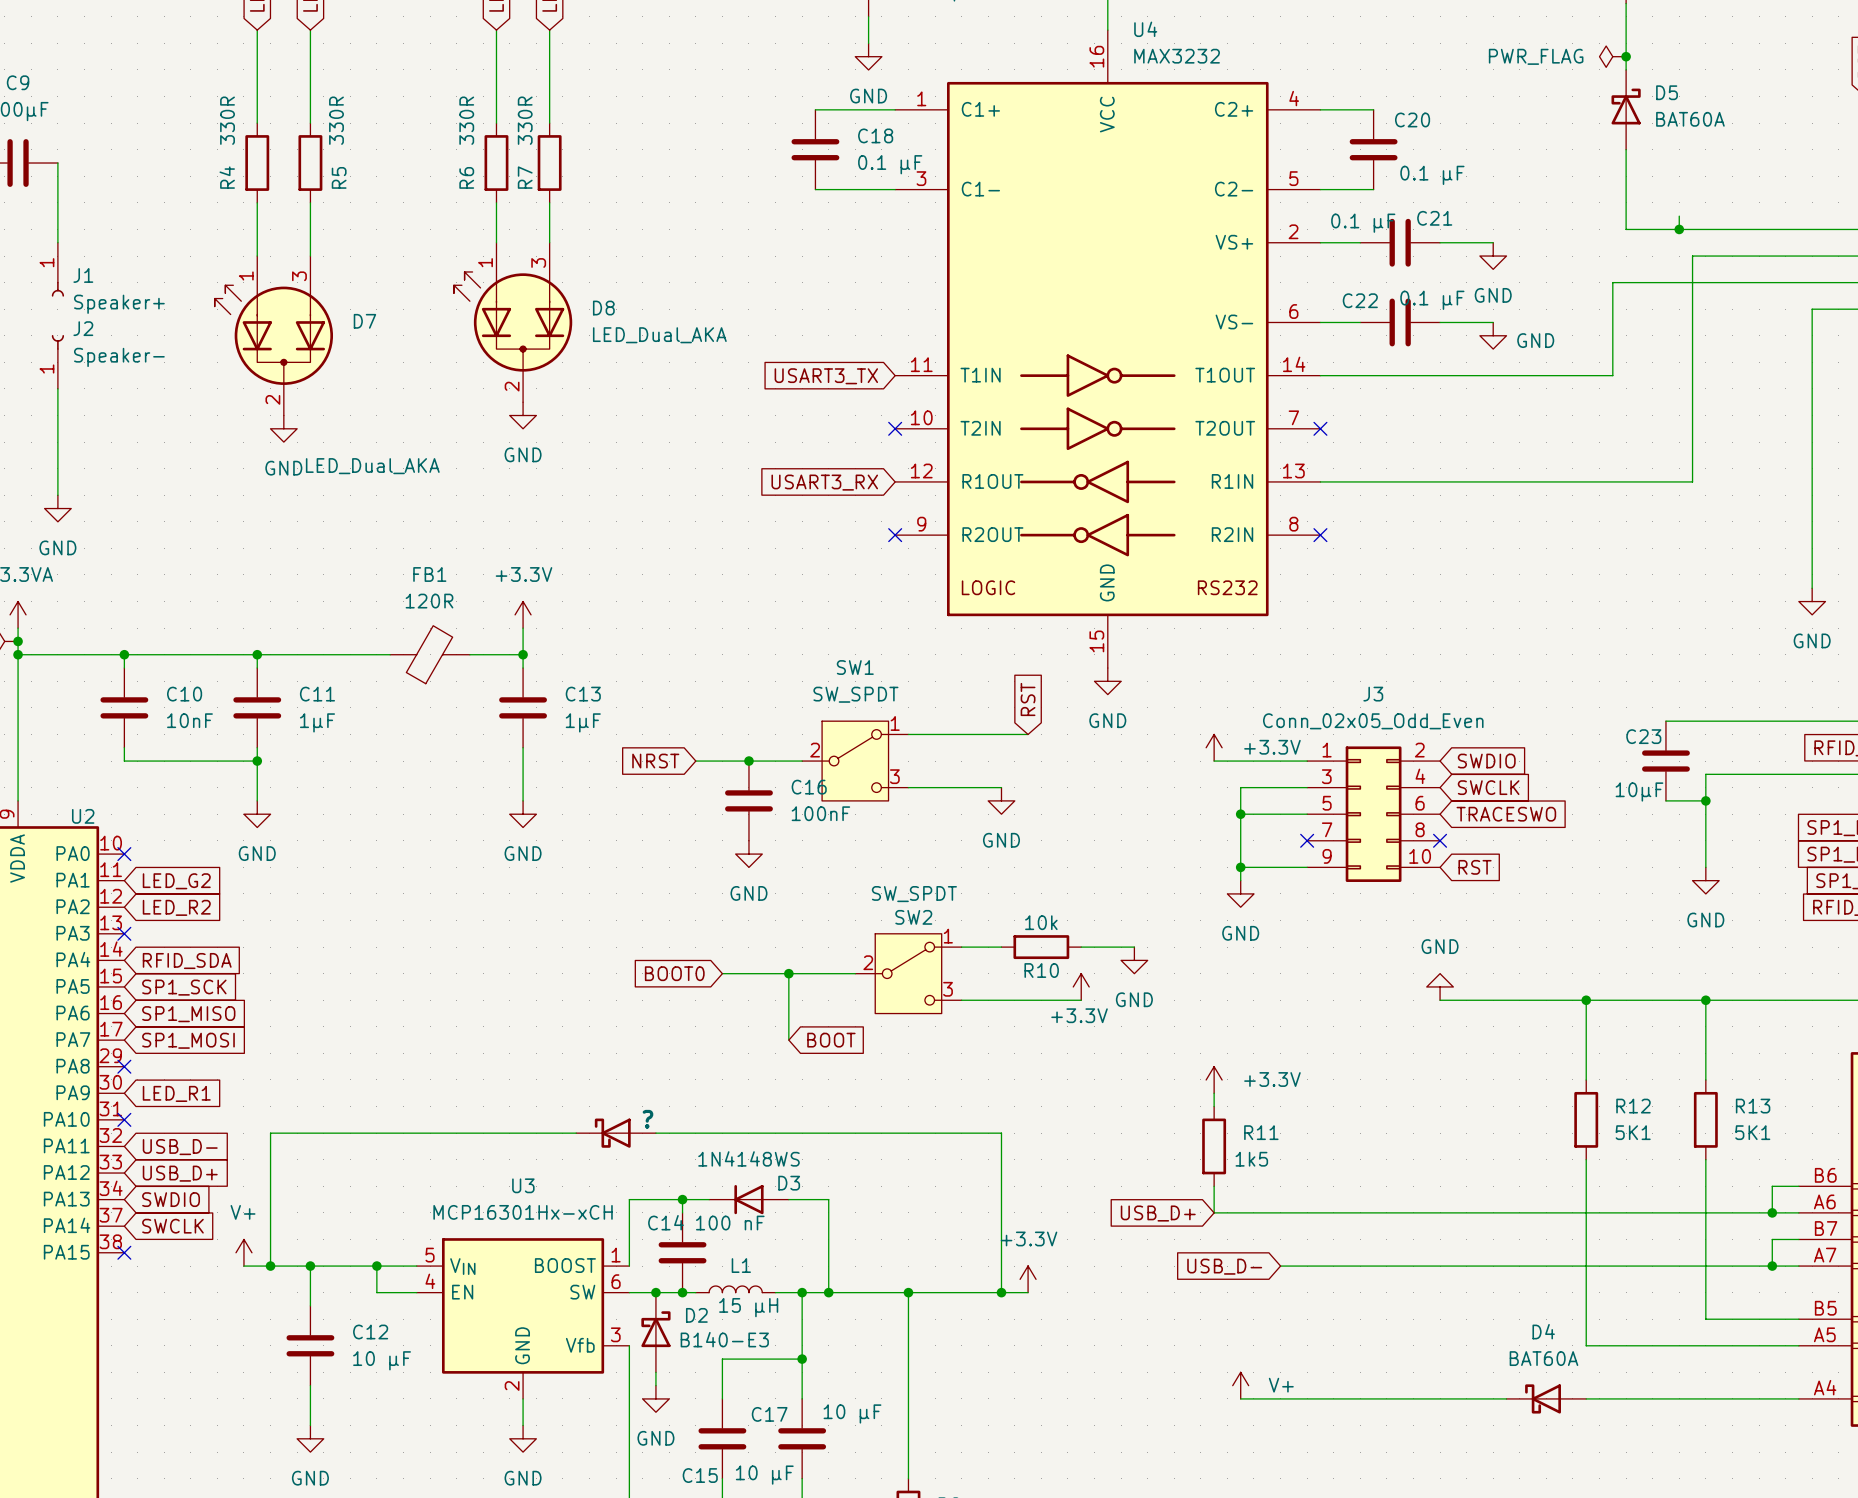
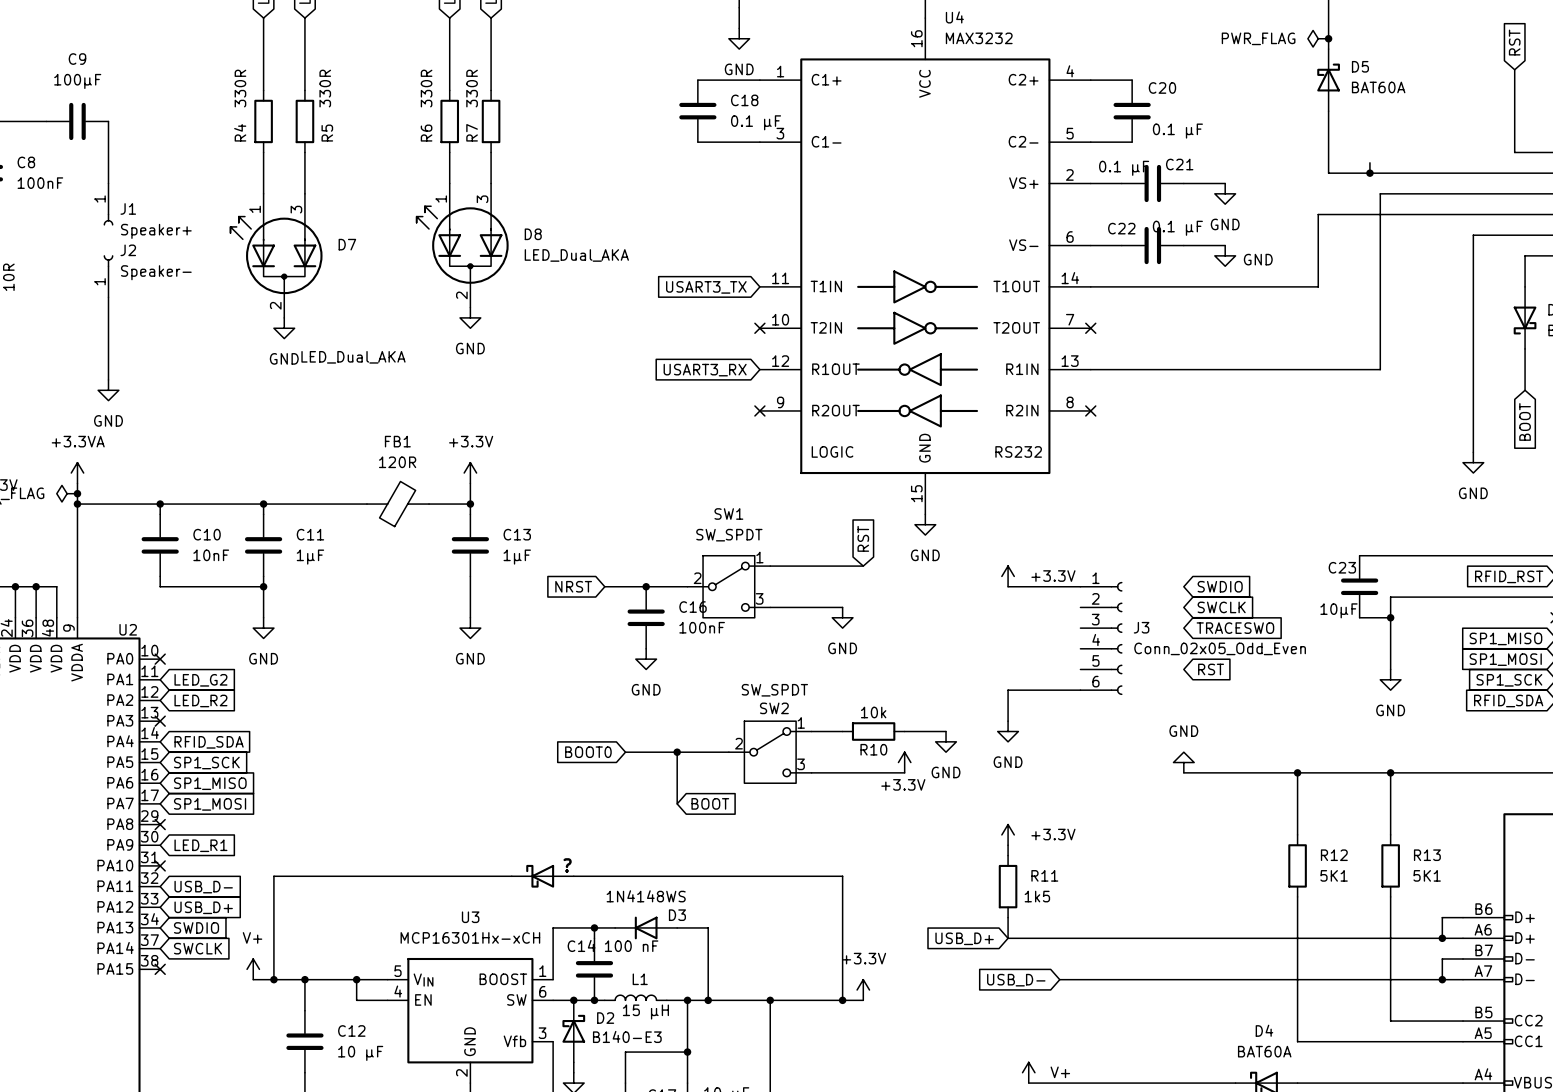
J3 name position: J3 (1373, 694) -> J3 (1141, 627)
J3 value position: Conn_02x05_Odd_Even (1373, 721) -> Conn_02x05_Odd_Even (1220, 648)
J3 symbol: [1307, 746, 1441, 882] -> [1080, 582, 1123, 695]
wire: (1307, 787) (1240, 787) (1240, 880) -> none
wire: (1240, 814) (1307, 814) -> none
junction: (1240, 814) -> none
no-connect mark: (1307, 840) -> none
no-connect mark: (1440, 840) -> none
wire: (1240, 867) (1307, 867) -> none
junction: (1240, 867) -> none
power symbol position: GND (1240, 893) -> GND (1008, 731)
wire: none -> (1080, 690) (1008, 690) (1008, 721)

